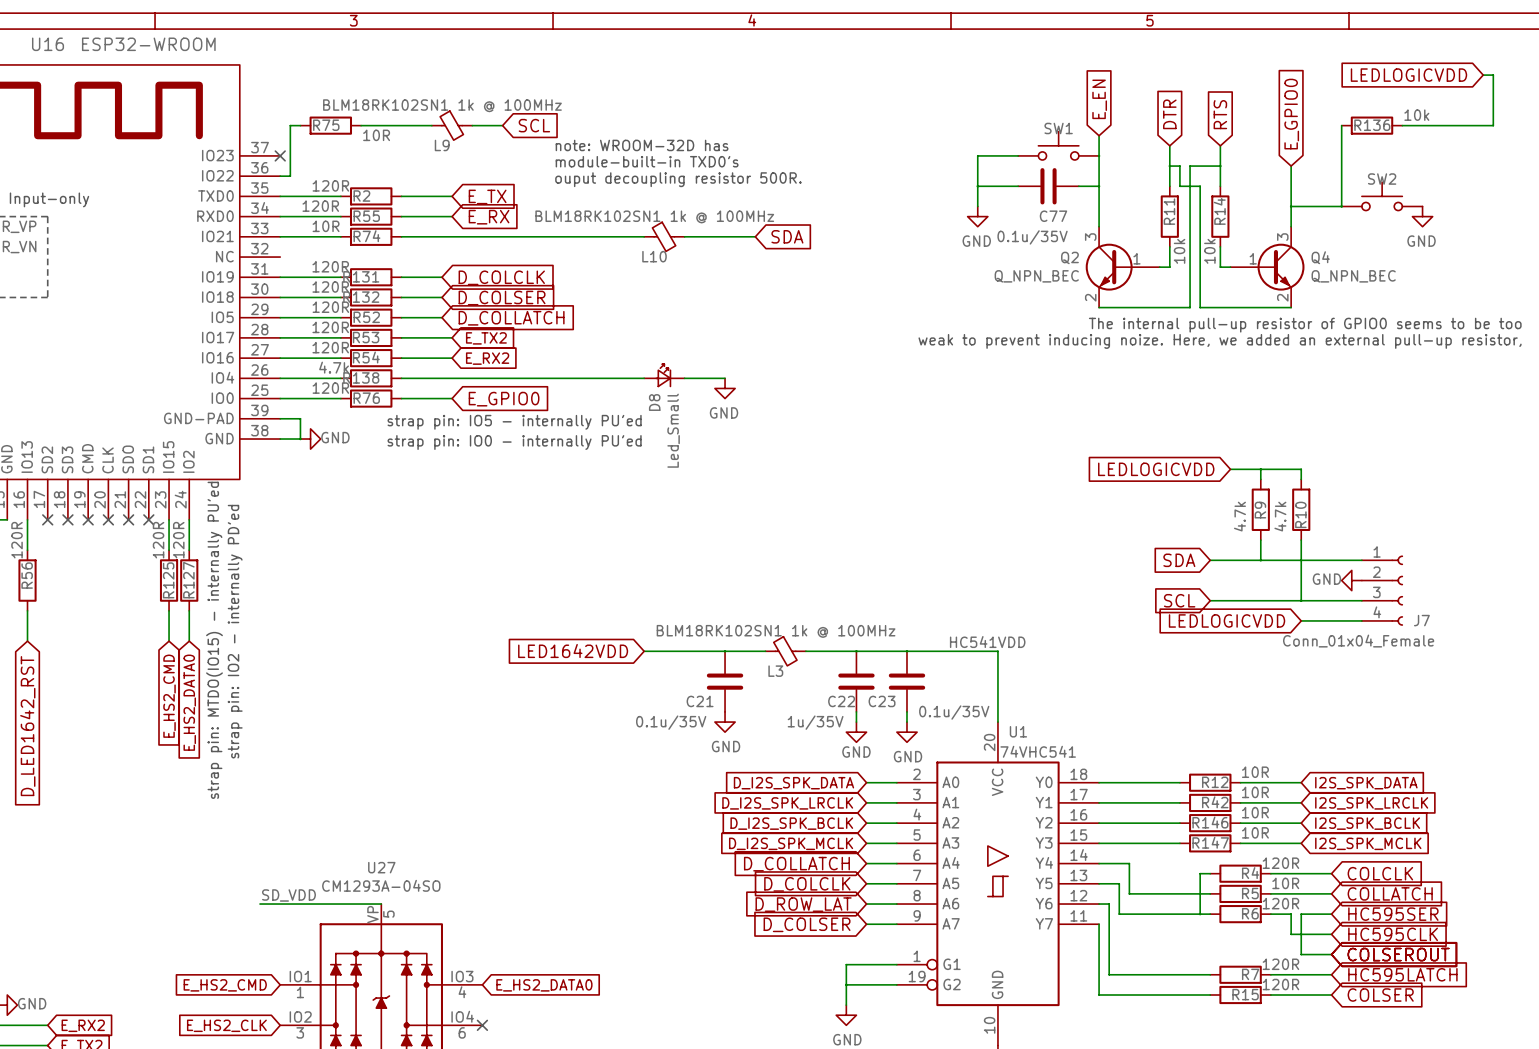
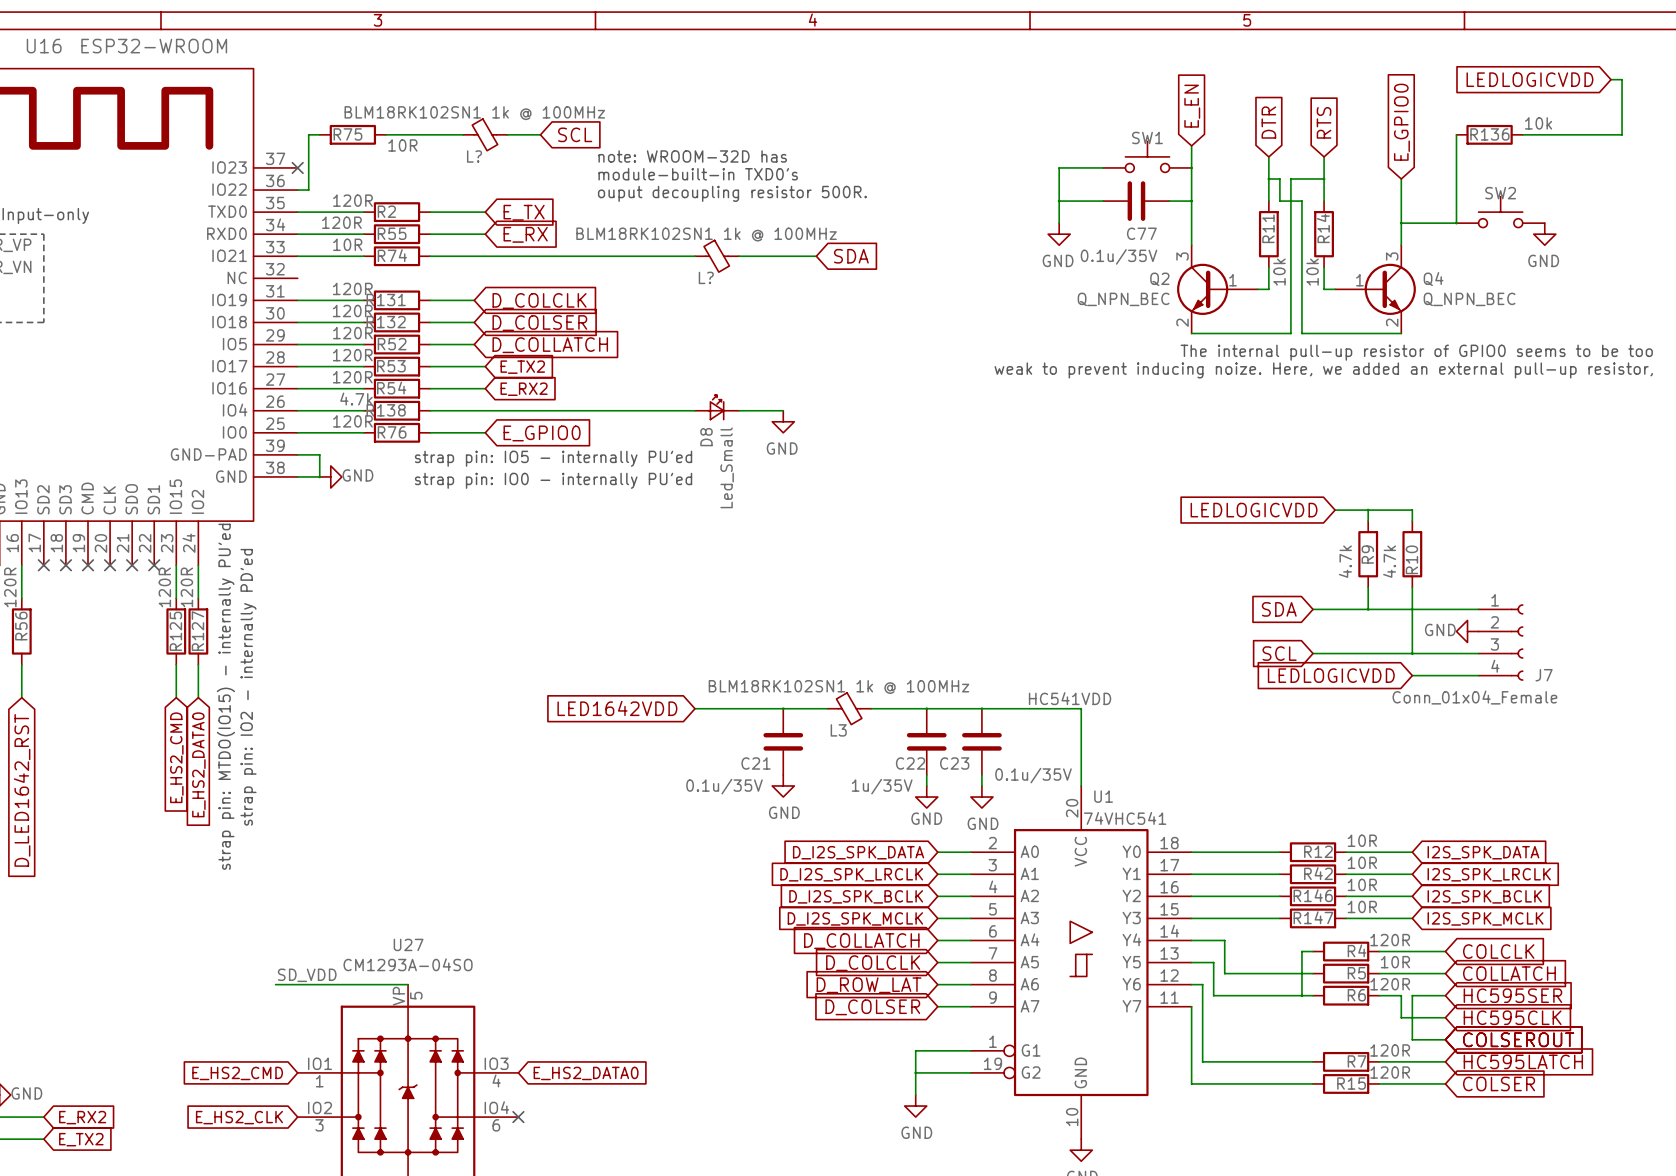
L9 name: L9 (442, 145) -> L? (474, 156)
L10 name: L10 (654, 256) -> L? (706, 277)

